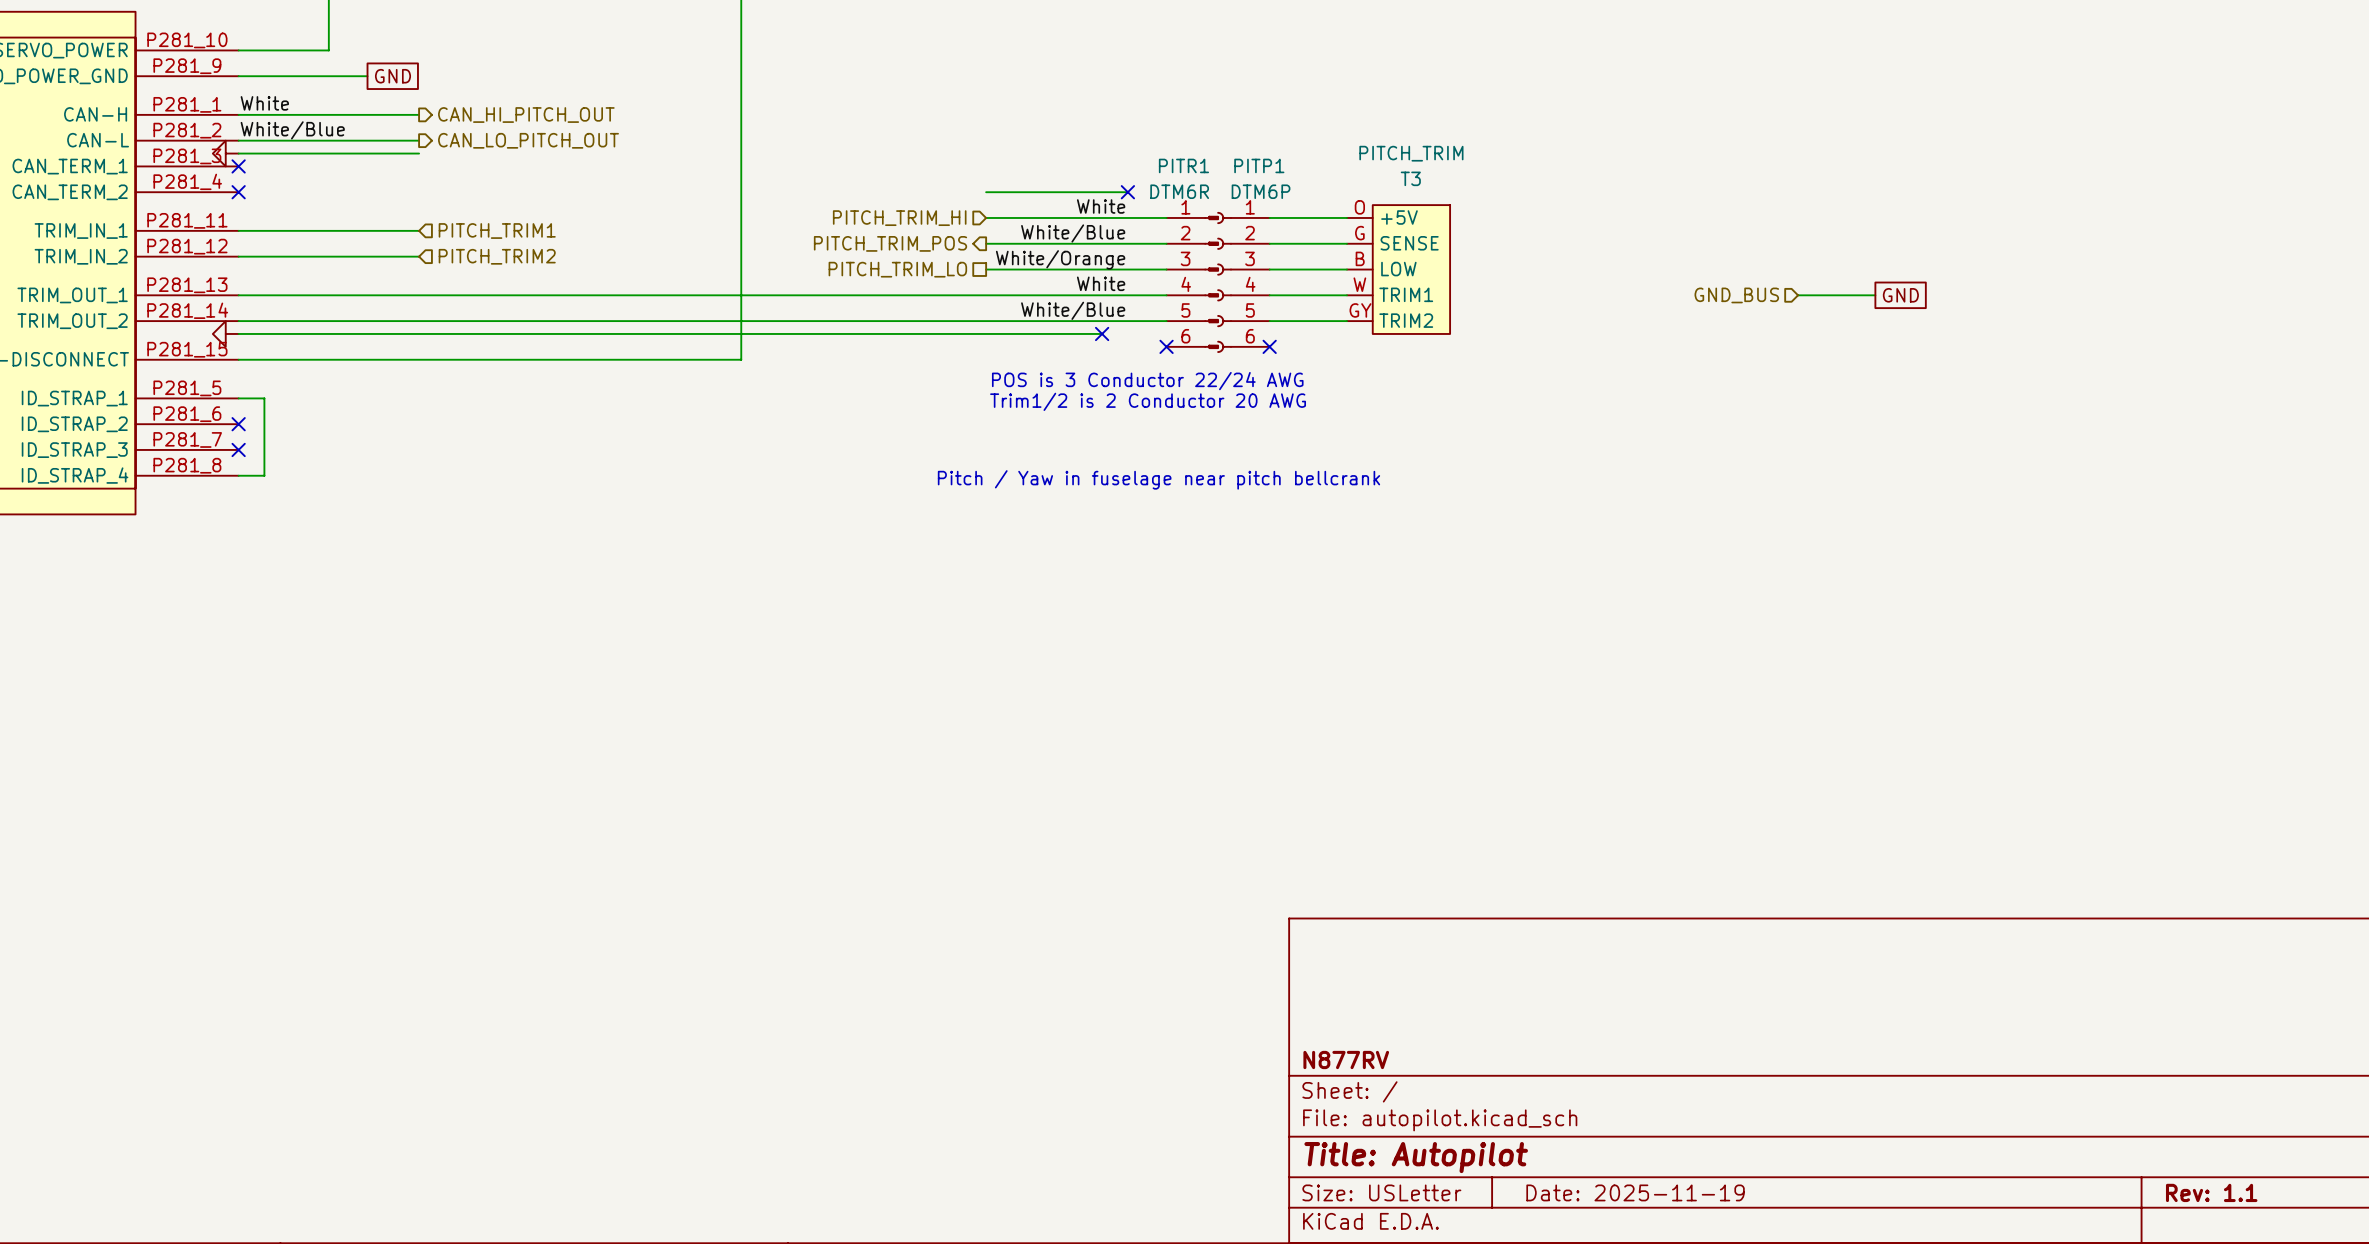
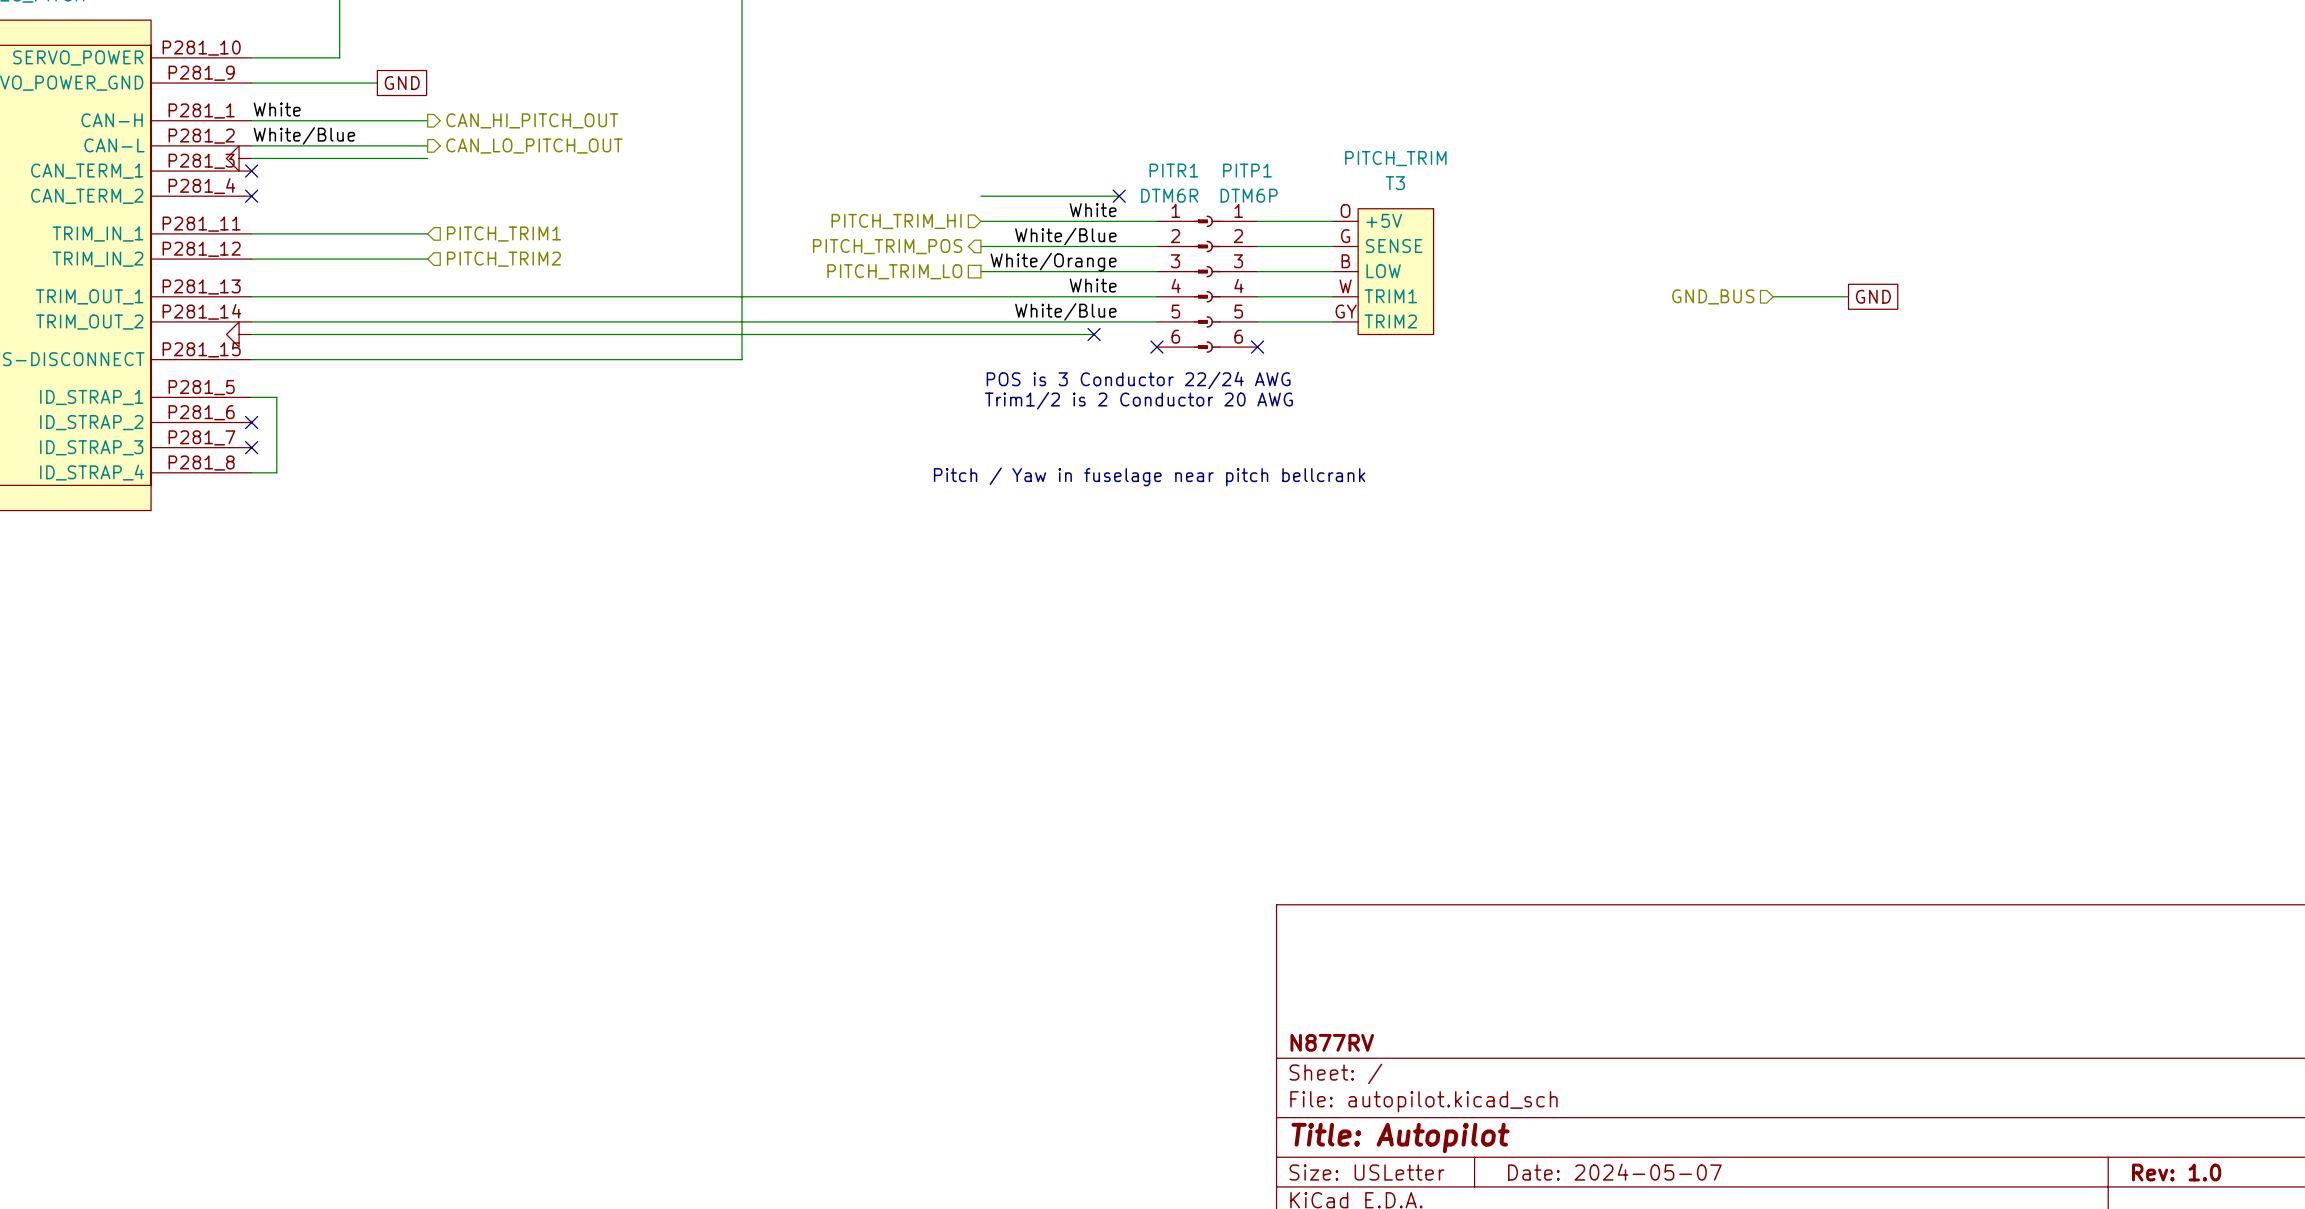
title block: Date: 2025-11-19 (1635, 1192) -> Date: 2024-05-07 (1614, 1172)
title block: Rev: 1.1 (2211, 1192) -> Rev: 1.0 (2176, 1172)

